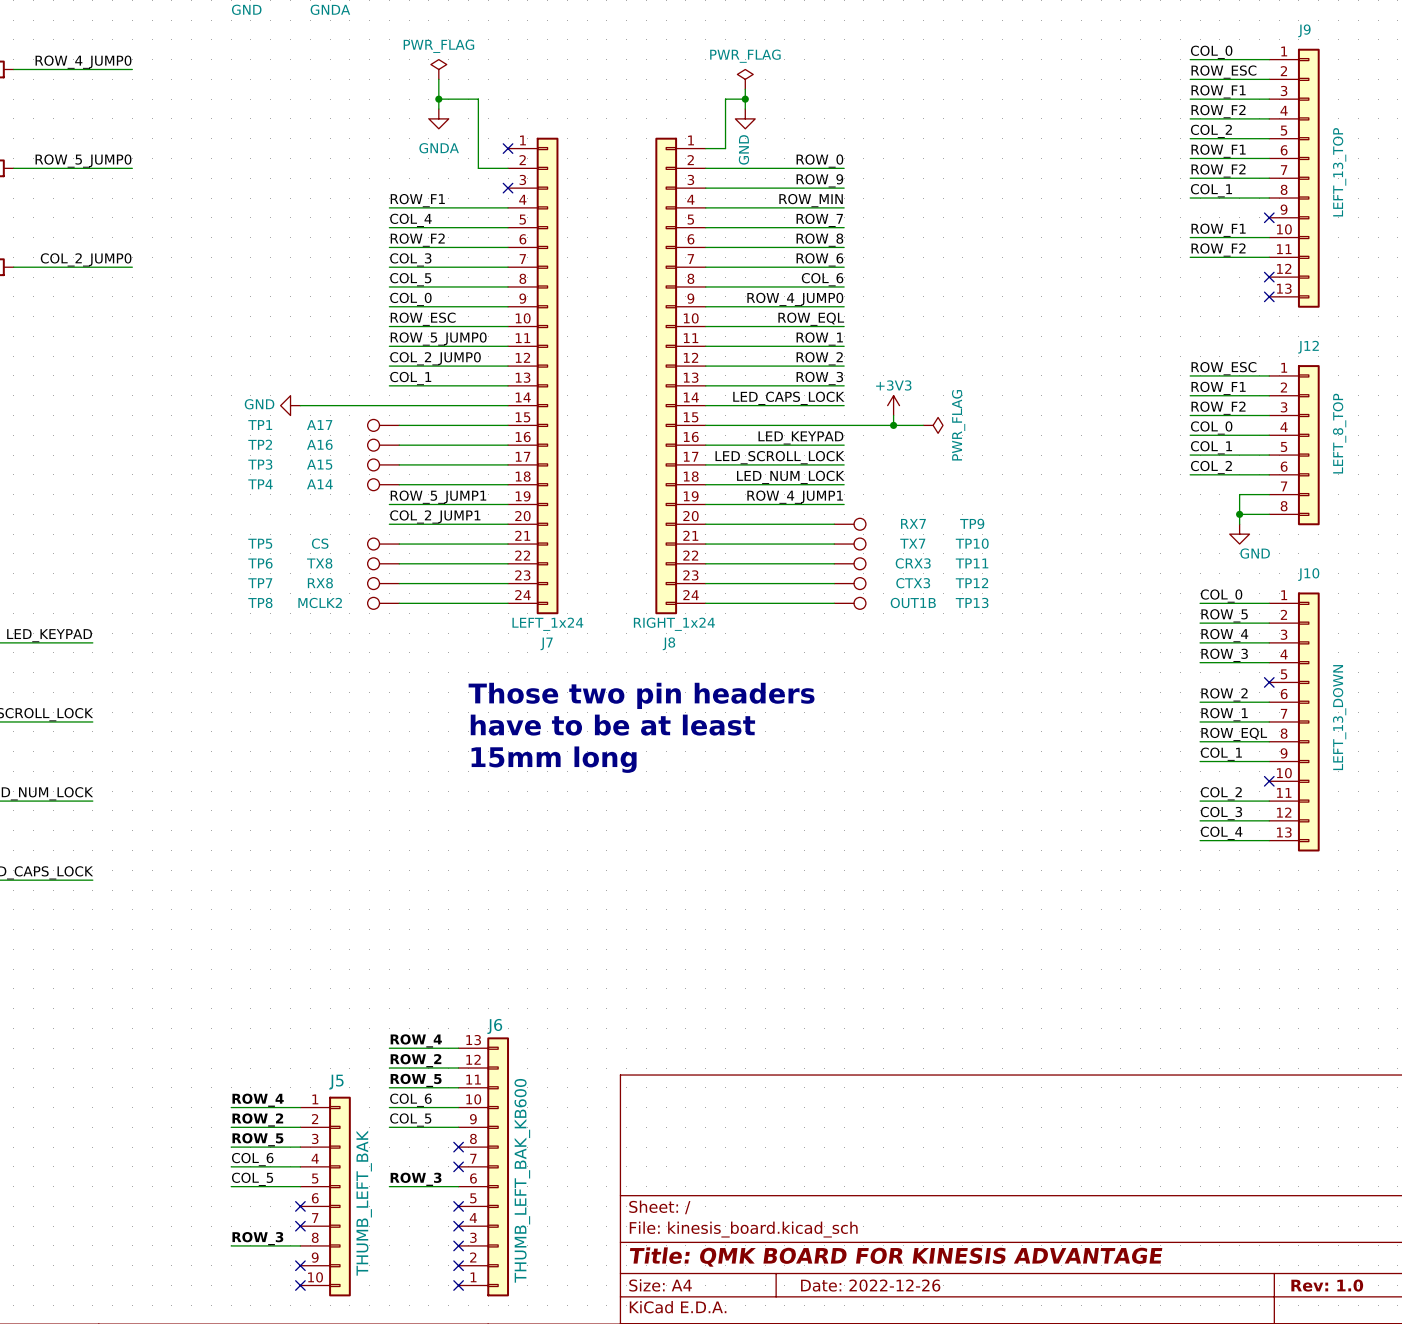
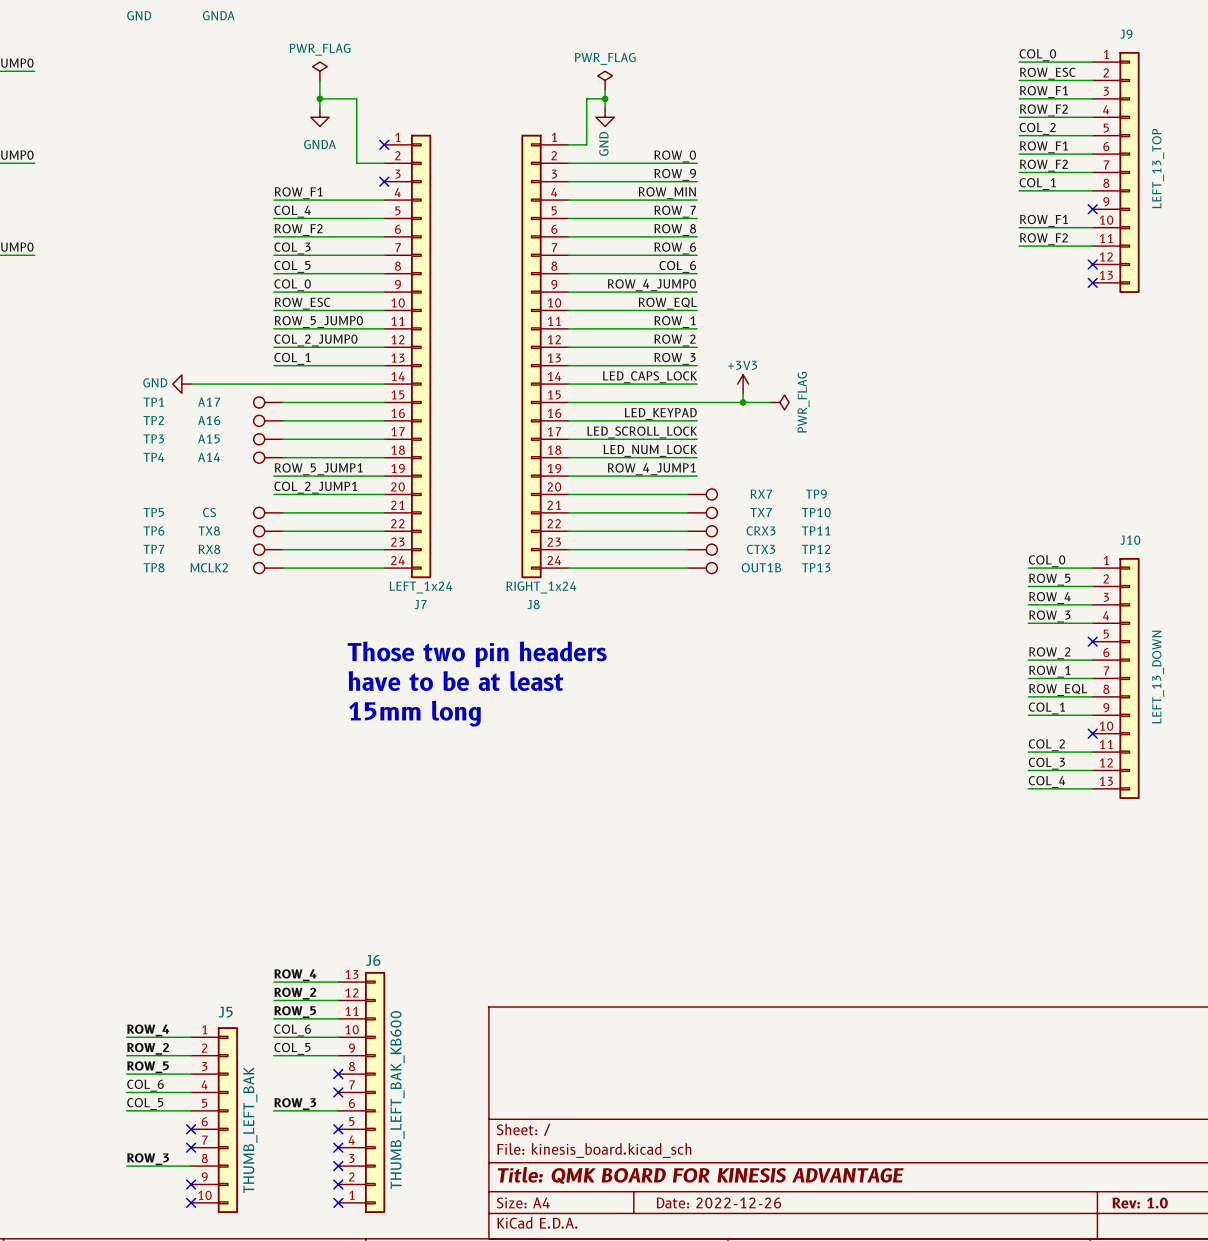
label: ROW_ESC (1223, 368) -> none
wire: (1190, 375) (1269, 375) -> none
label: ROW_F1 (1218, 388) -> none
wire: (1190, 395) (1269, 395) -> none
label: ROW_F2 (1218, 408) -> none
wire: (1190, 415) (1269, 415) -> none
label: COL_0 (1211, 427) -> none
wire: (1190, 435) (1269, 435) -> none
J12: LEFT_8_TOP (1294, 445) -> none
label: COL_1 (1211, 447) -> none
wire: (1190, 455) (1269, 455) -> none
label: COL_2 (1211, 467) -> none
wire: (1190, 474) (1269, 474) -> none
wire: (1269, 494) (1239, 494) (1239, 524) -> none
wire: (1239, 514) (1269, 514) -> none
junction: (1239, 514) -> none
power symbol: GND (1239, 534) -> none

